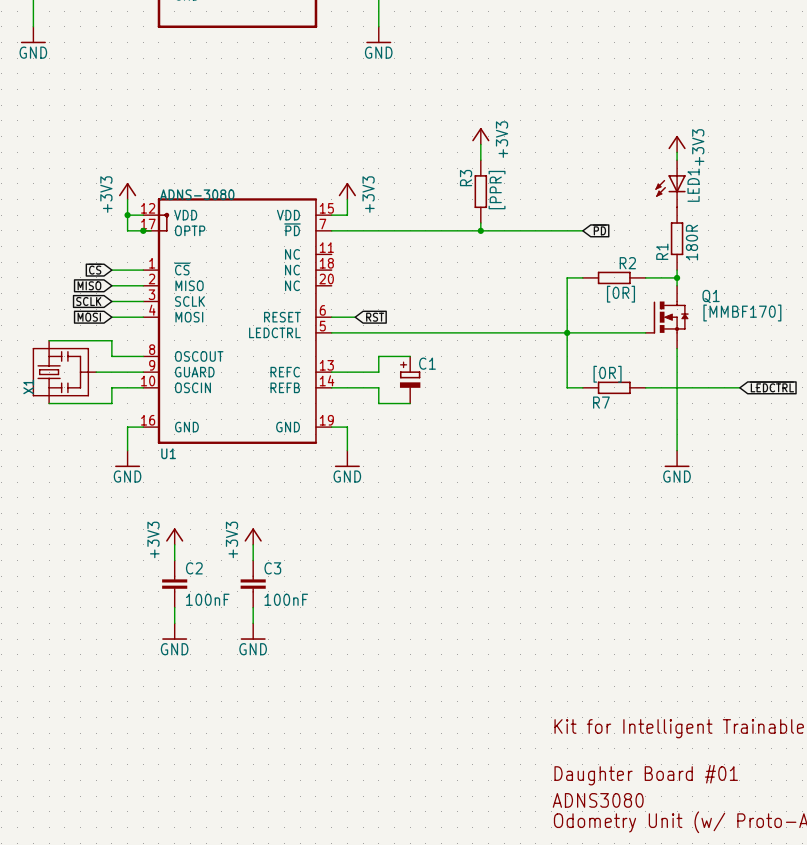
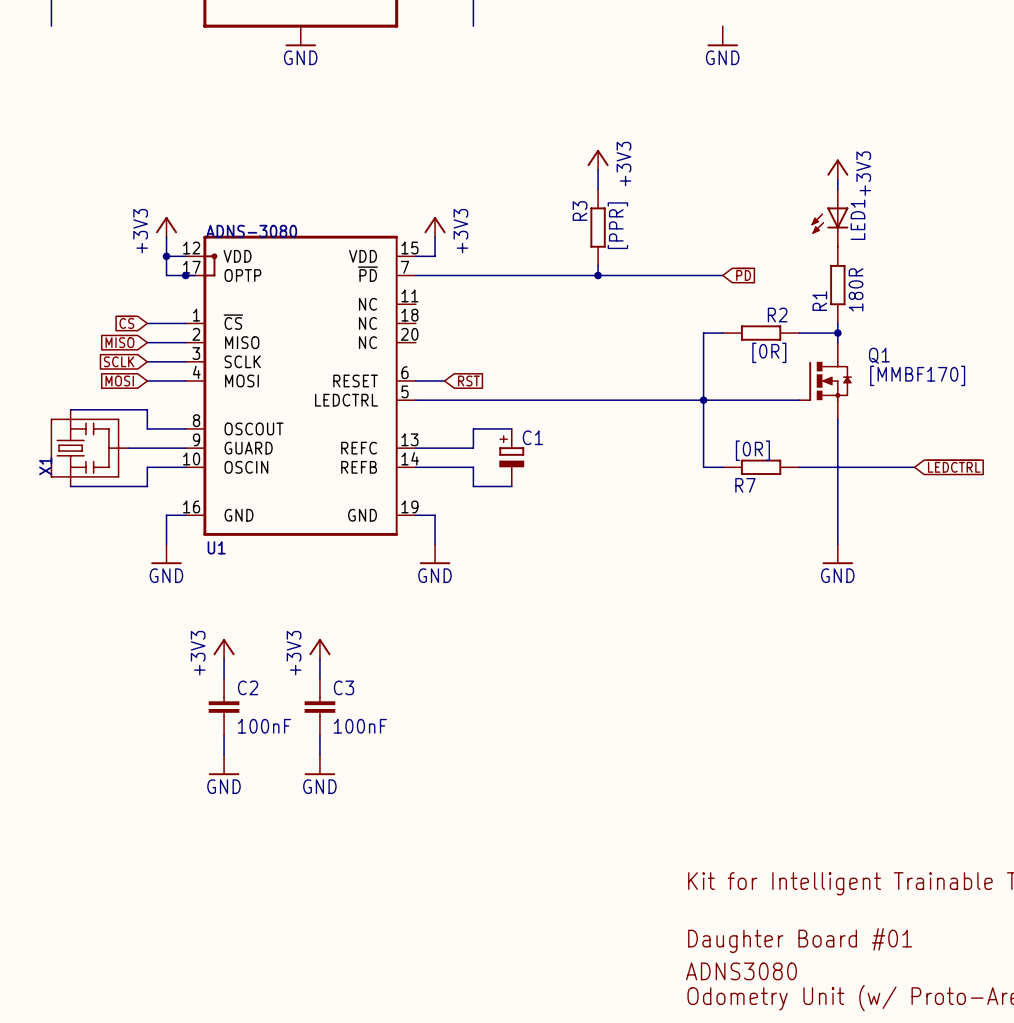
power symbol: GND (33, 35) -> none
power symbol: none -> GND (300, 36)
power symbol: GND (378, 35) -> none
power symbol: none -> GND (722, 36)

